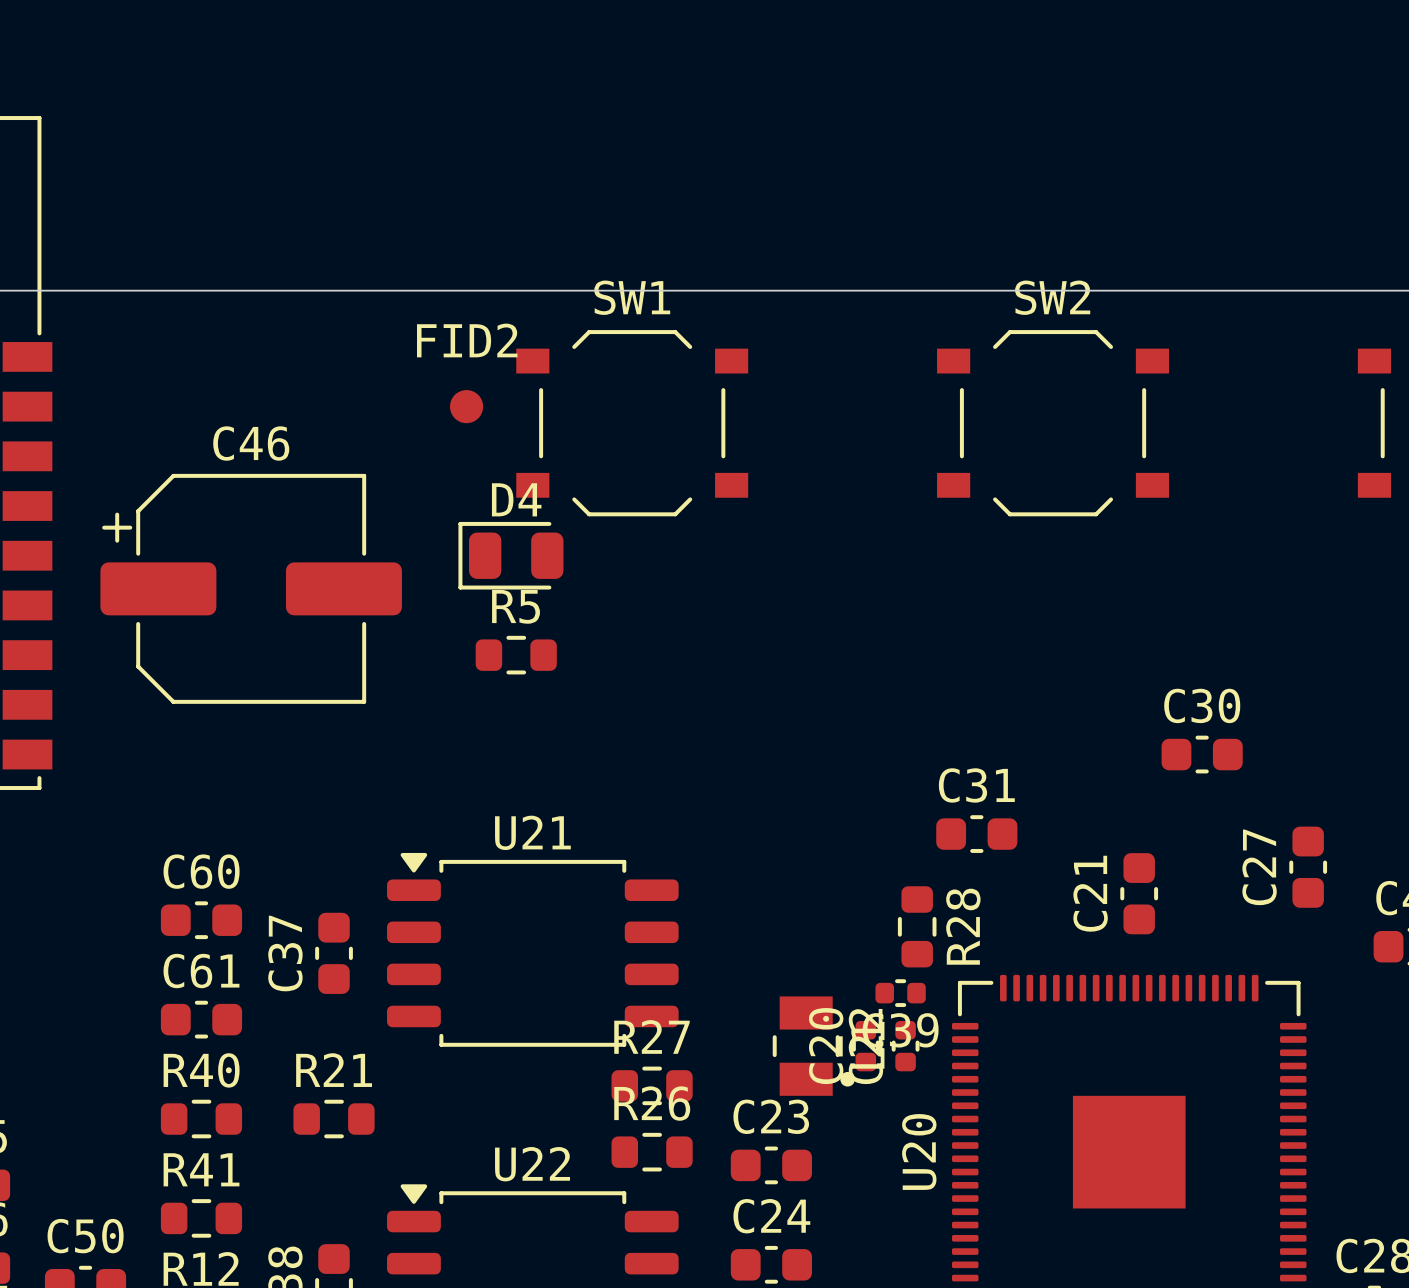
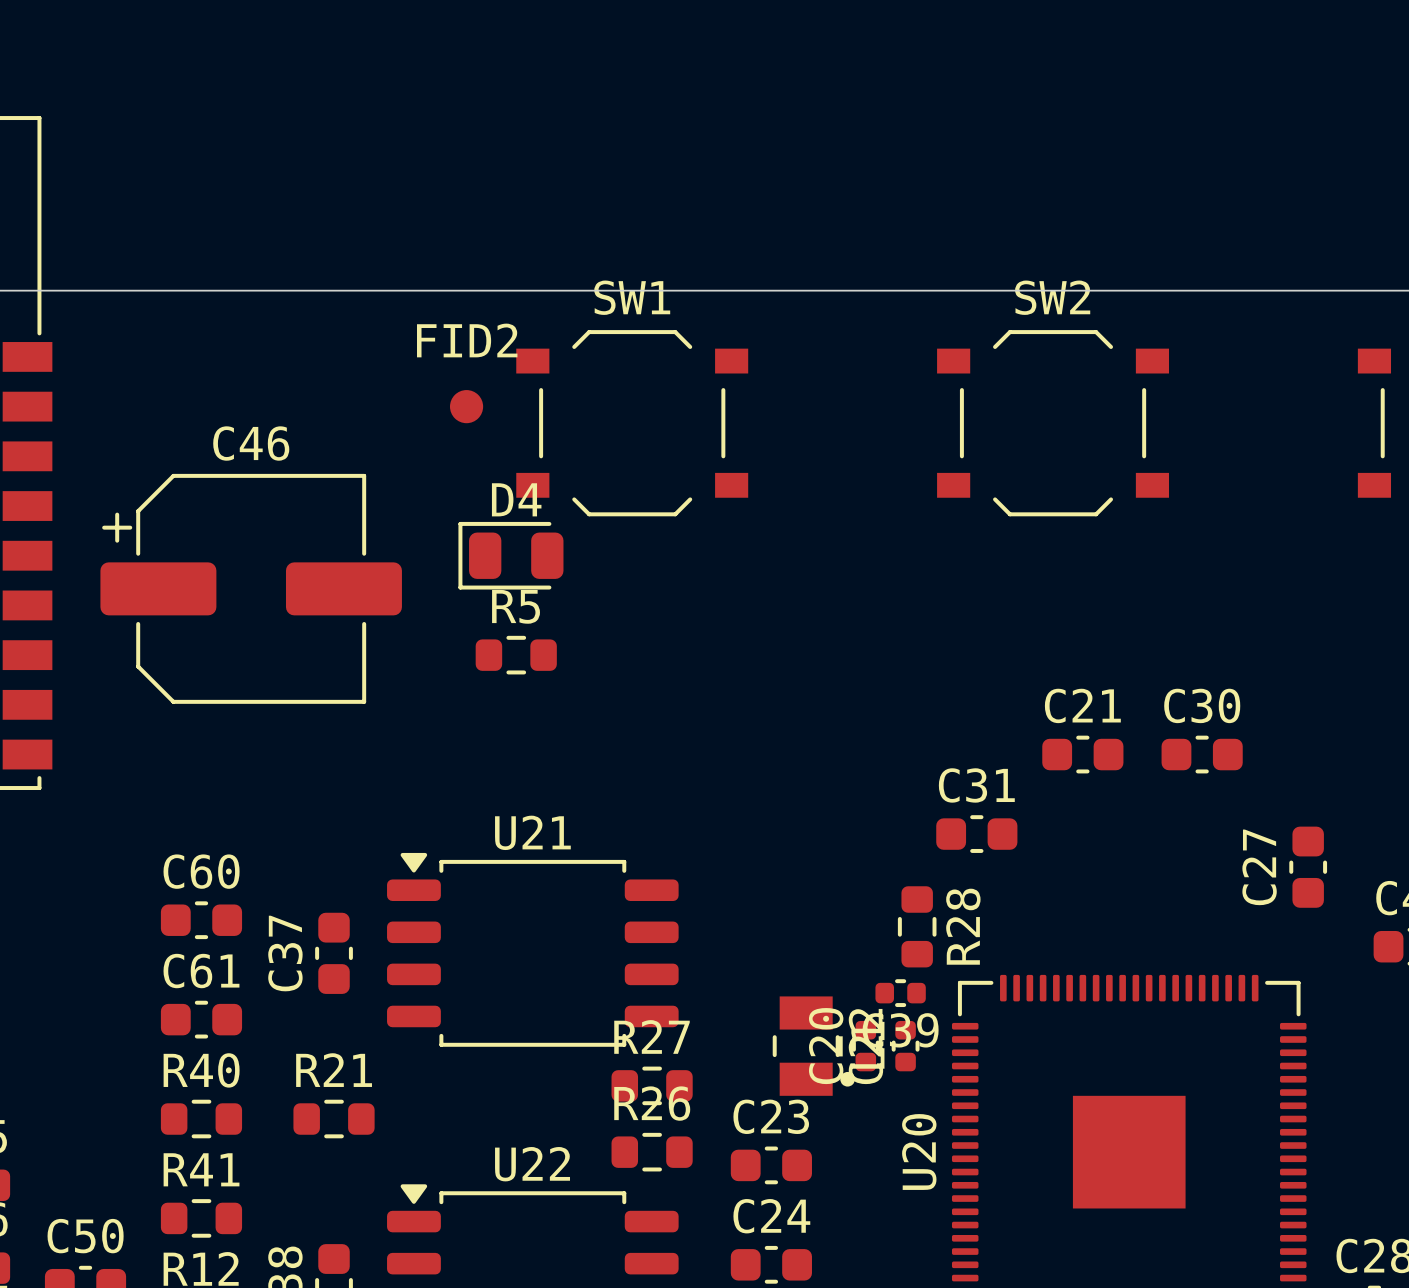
C21 rotation: 0° (1139, 893) -> 90° clockwise (1082, 754)
C21 position: (1139, 893) -> (1082, 754)

